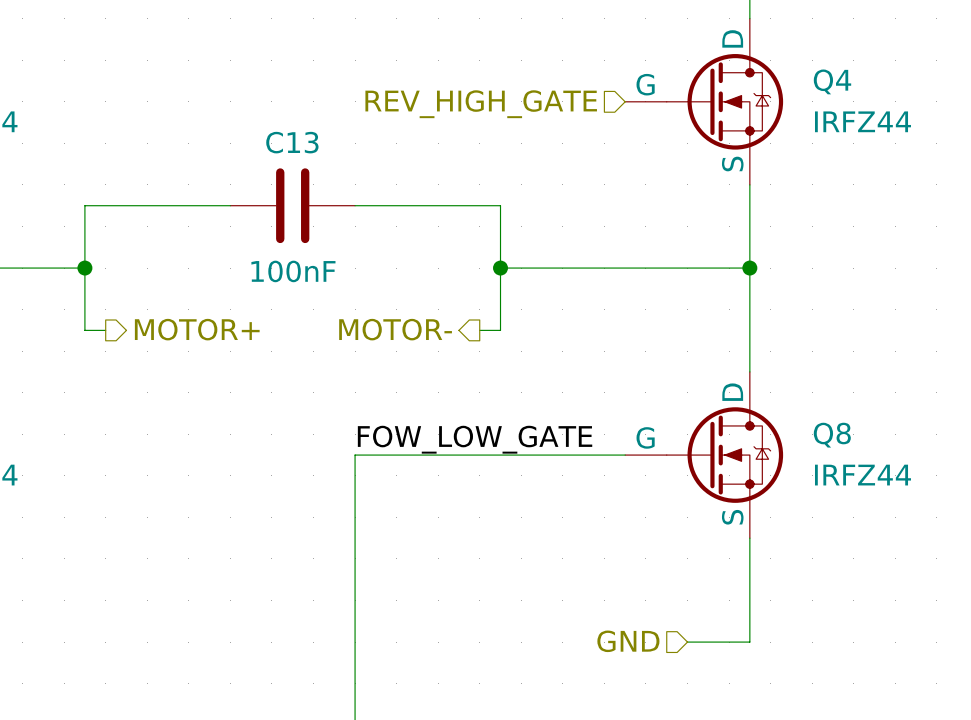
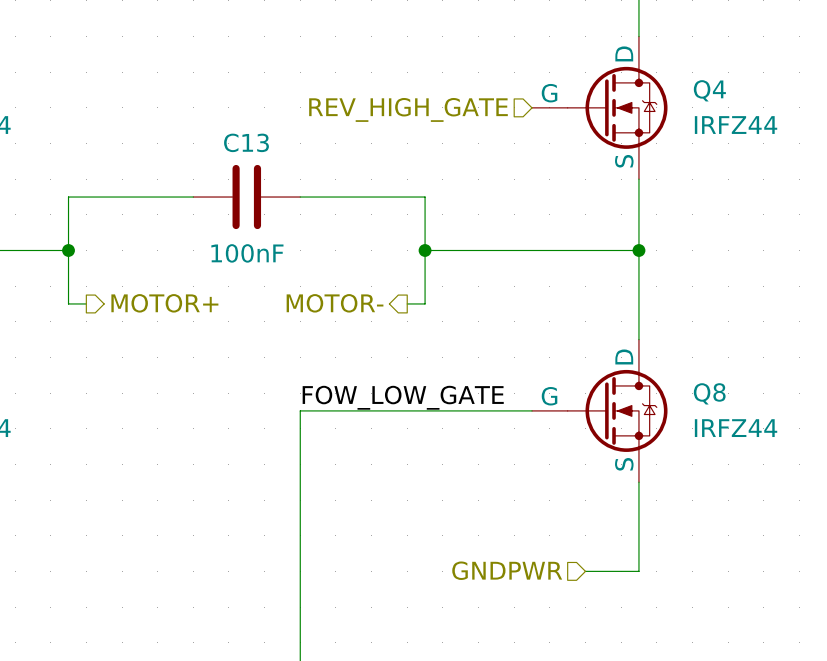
hierarchical label: GND (628, 641) -> GNDPWR (507, 570)

